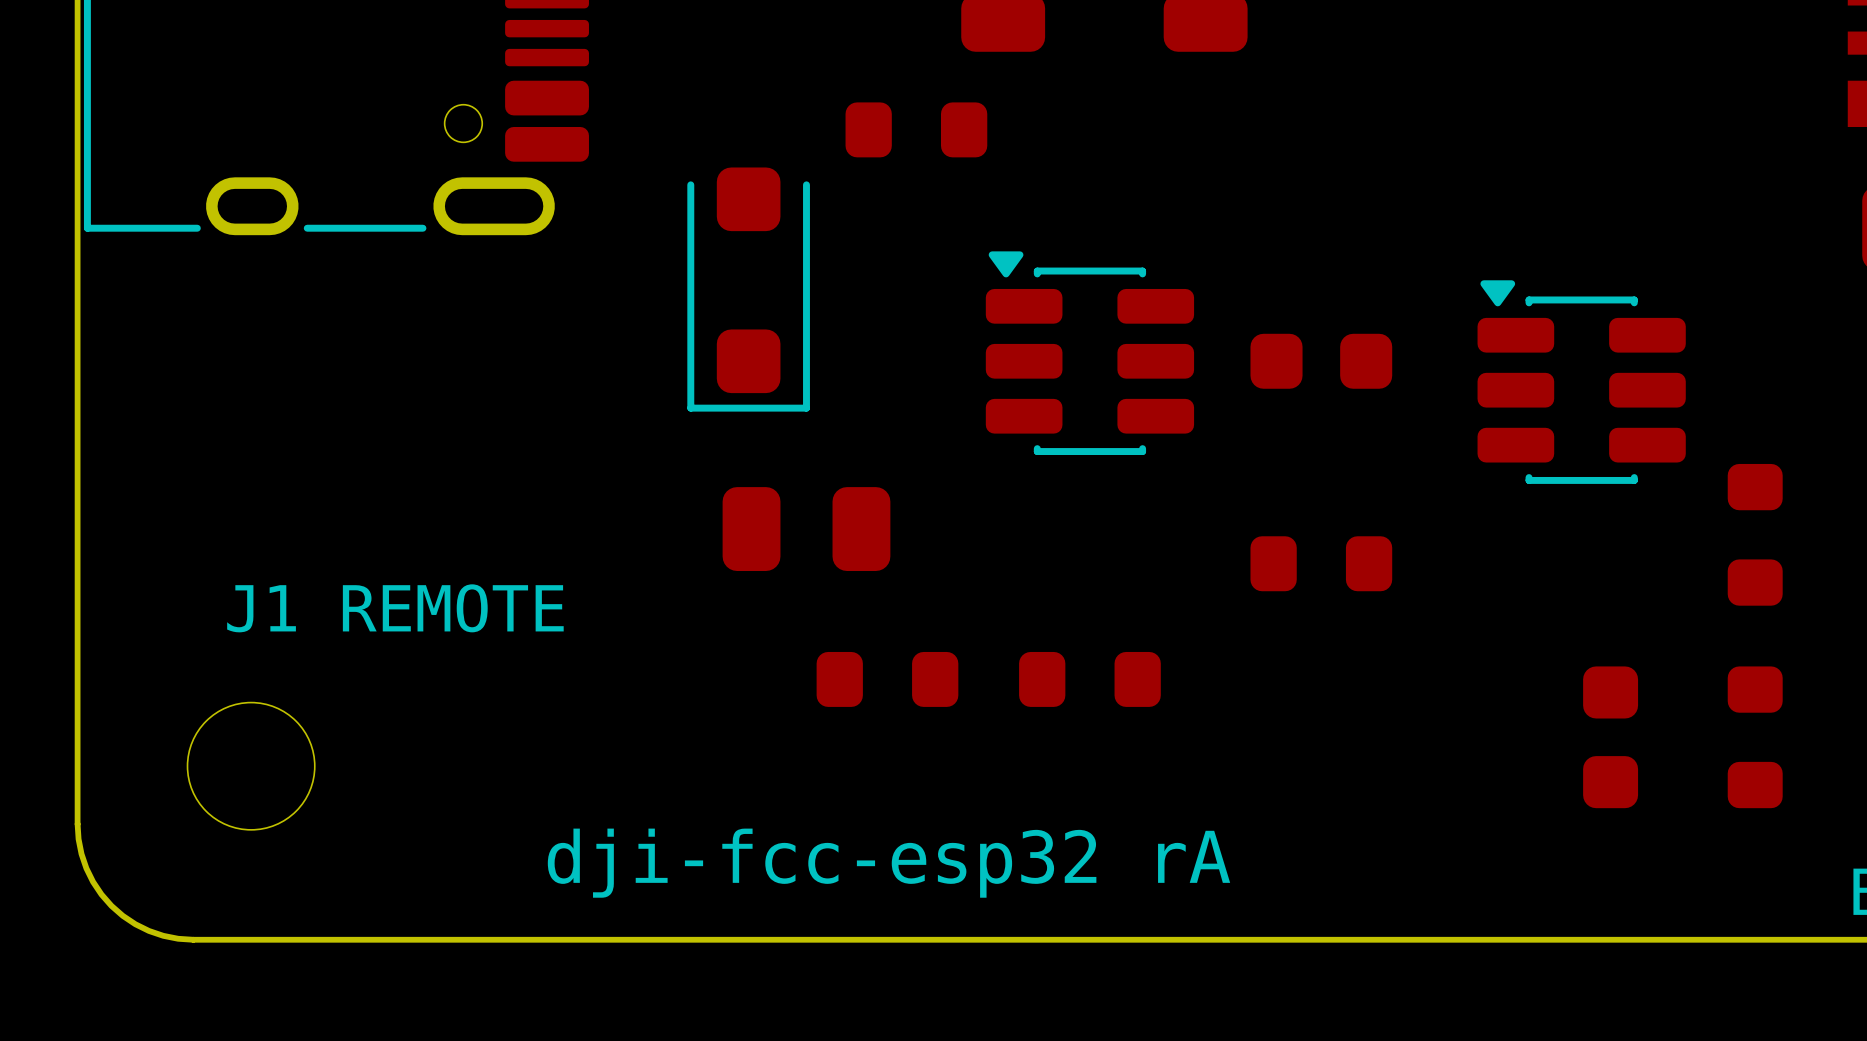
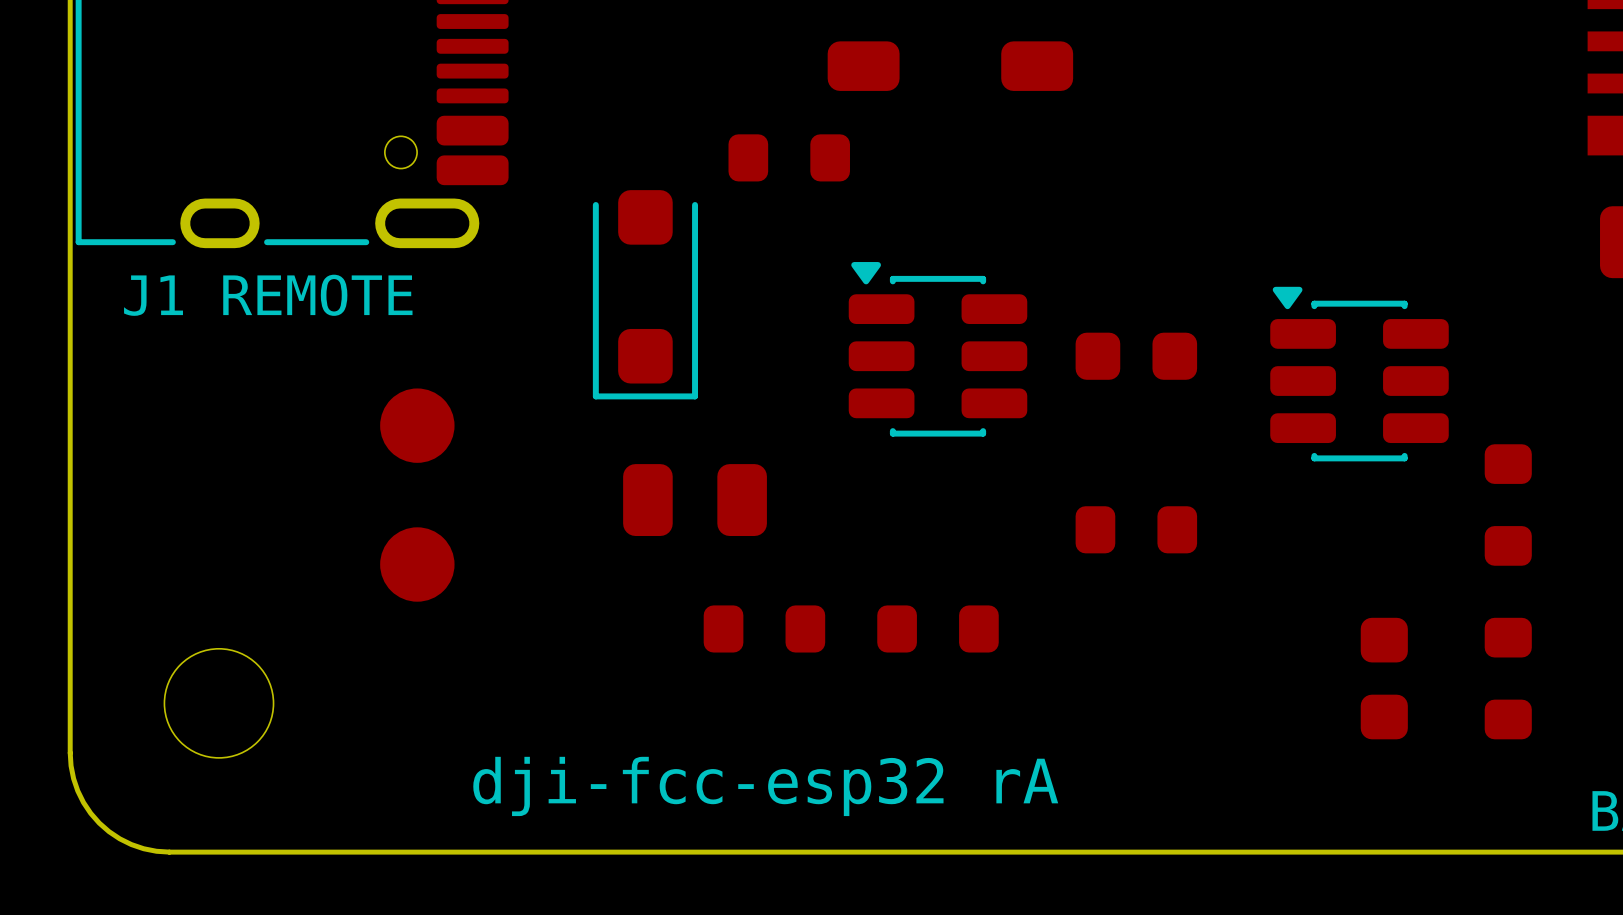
part: none -> (417, 425)
part: none -> (417, 564)
text position: J1 REMOTE (395, 608) -> J1 REMOTE (268, 295)

